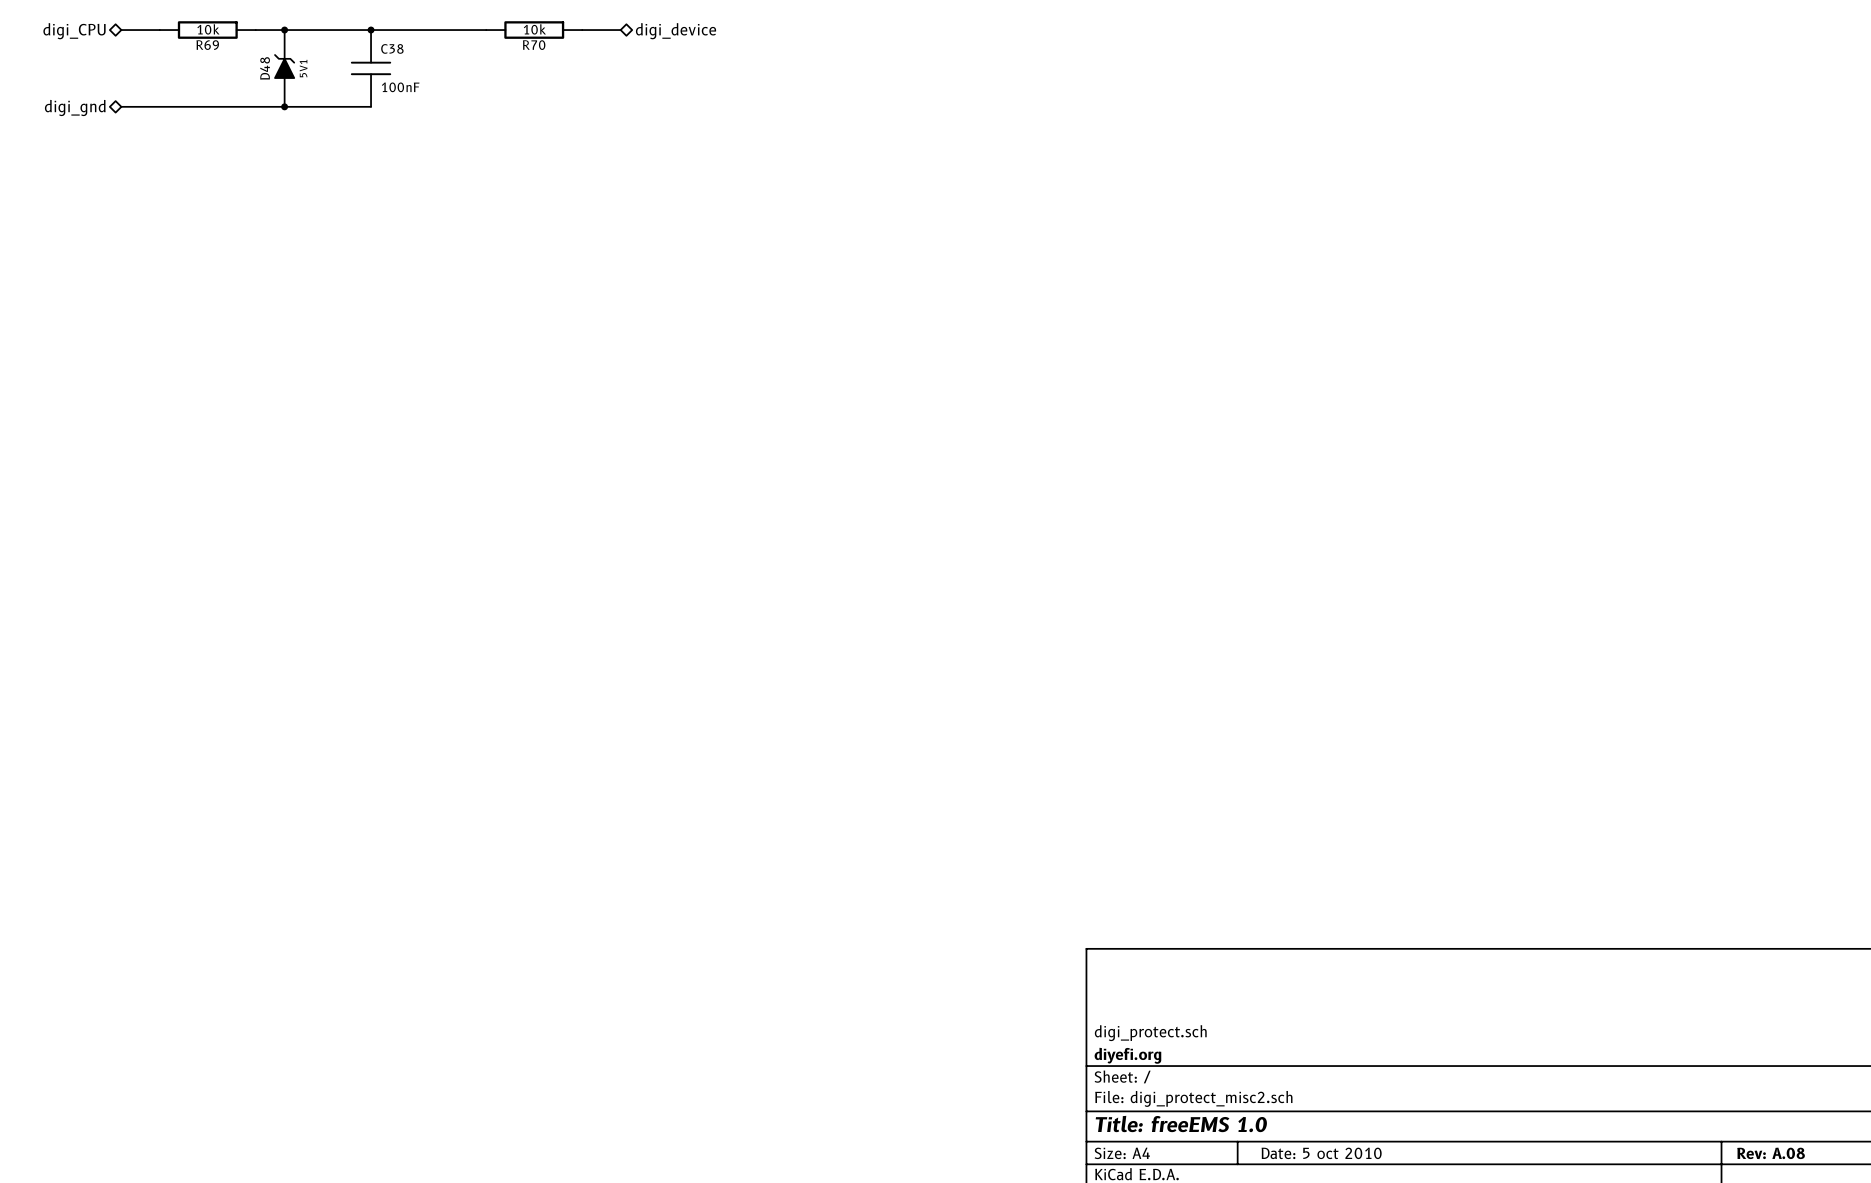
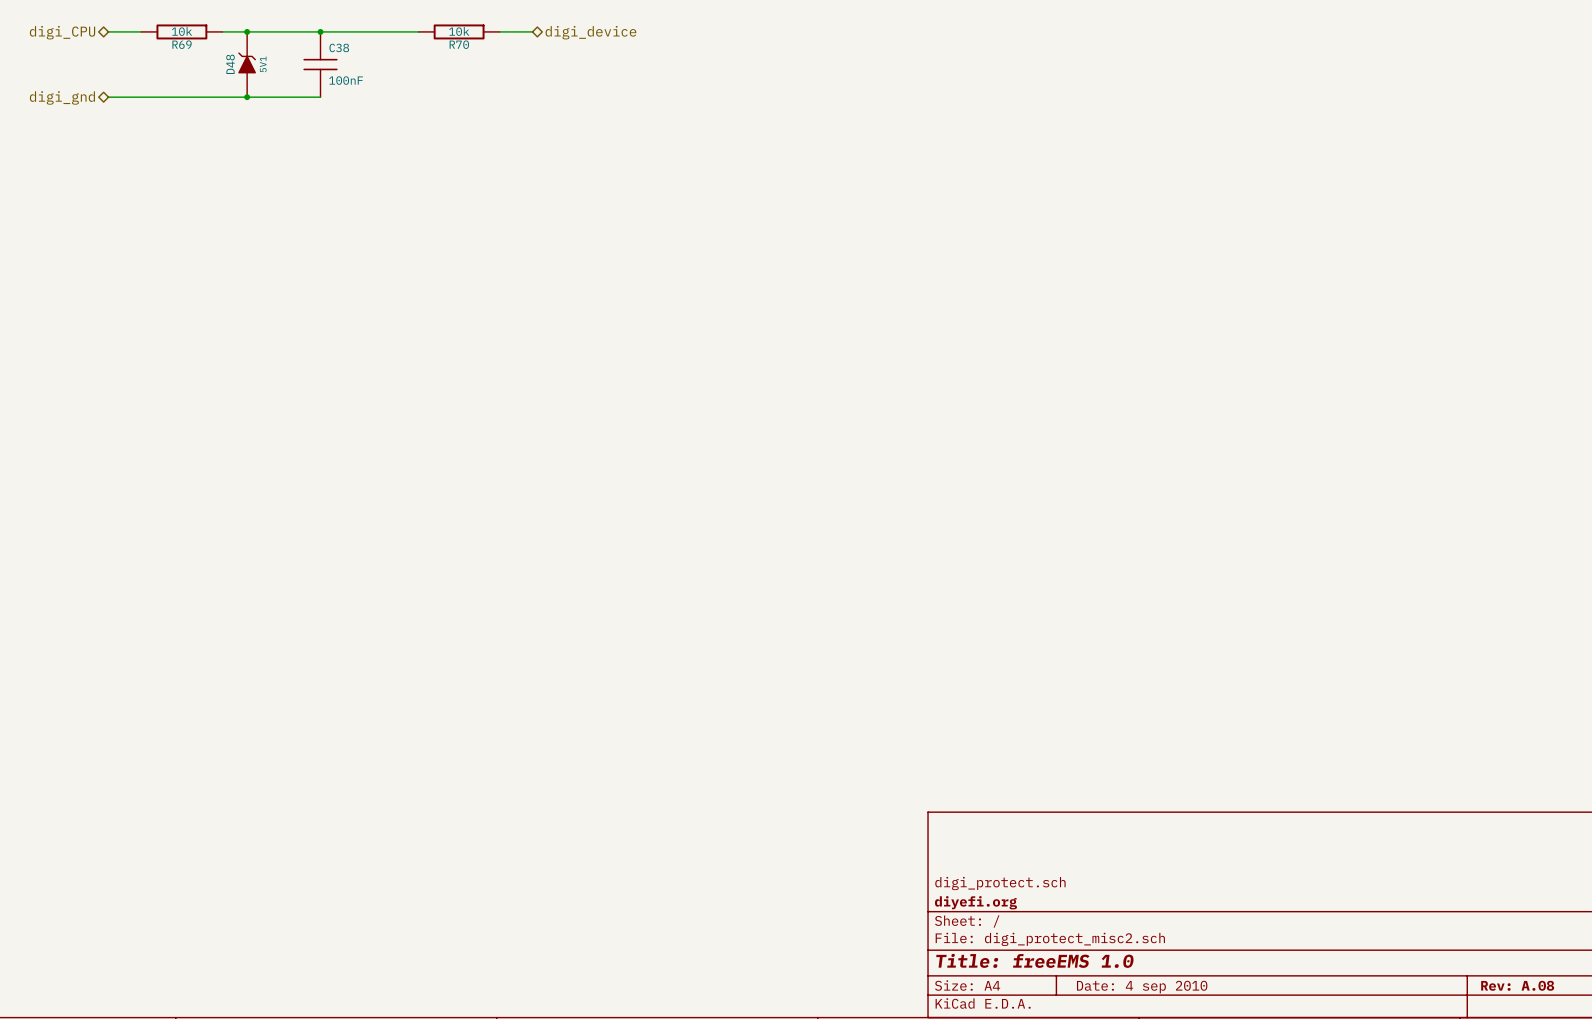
title block: Date: 5 oct 2010 (1321, 1153) -> Date: 4 sep 2010 (1142, 987)

